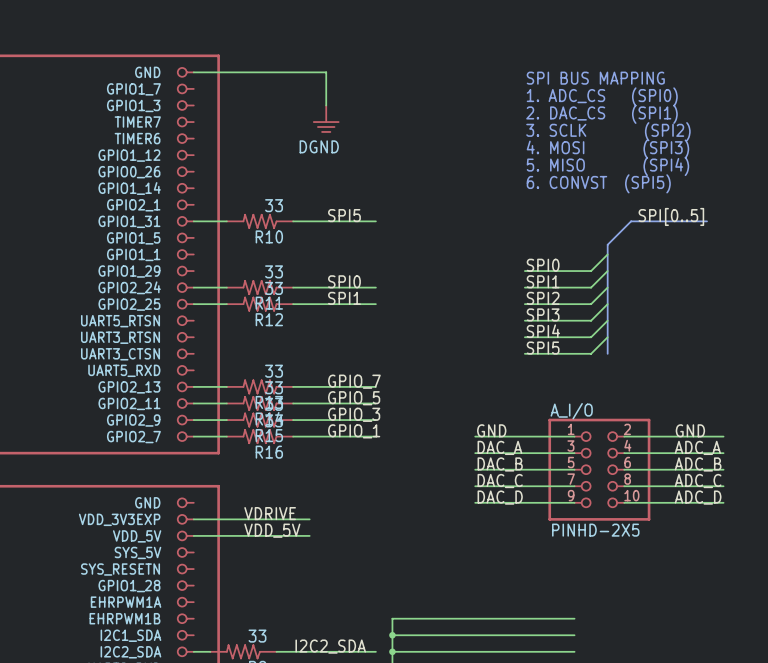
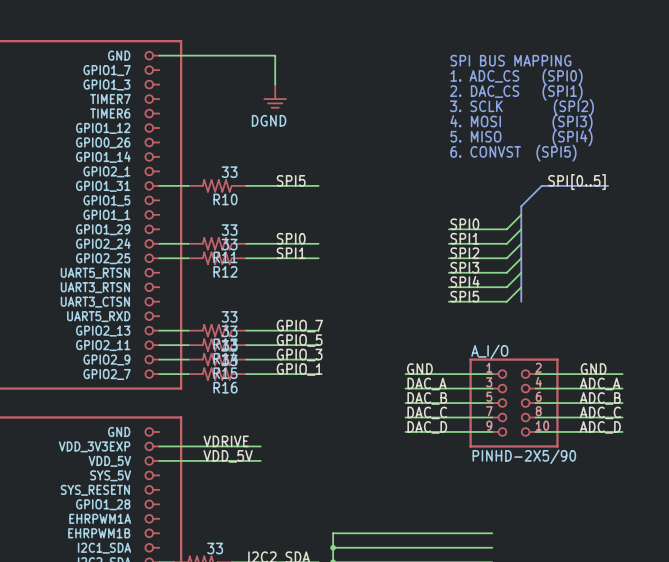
A_I/O value: PINHD-2X5 (595, 530) -> PINHD-2X5/90 (524, 456)

